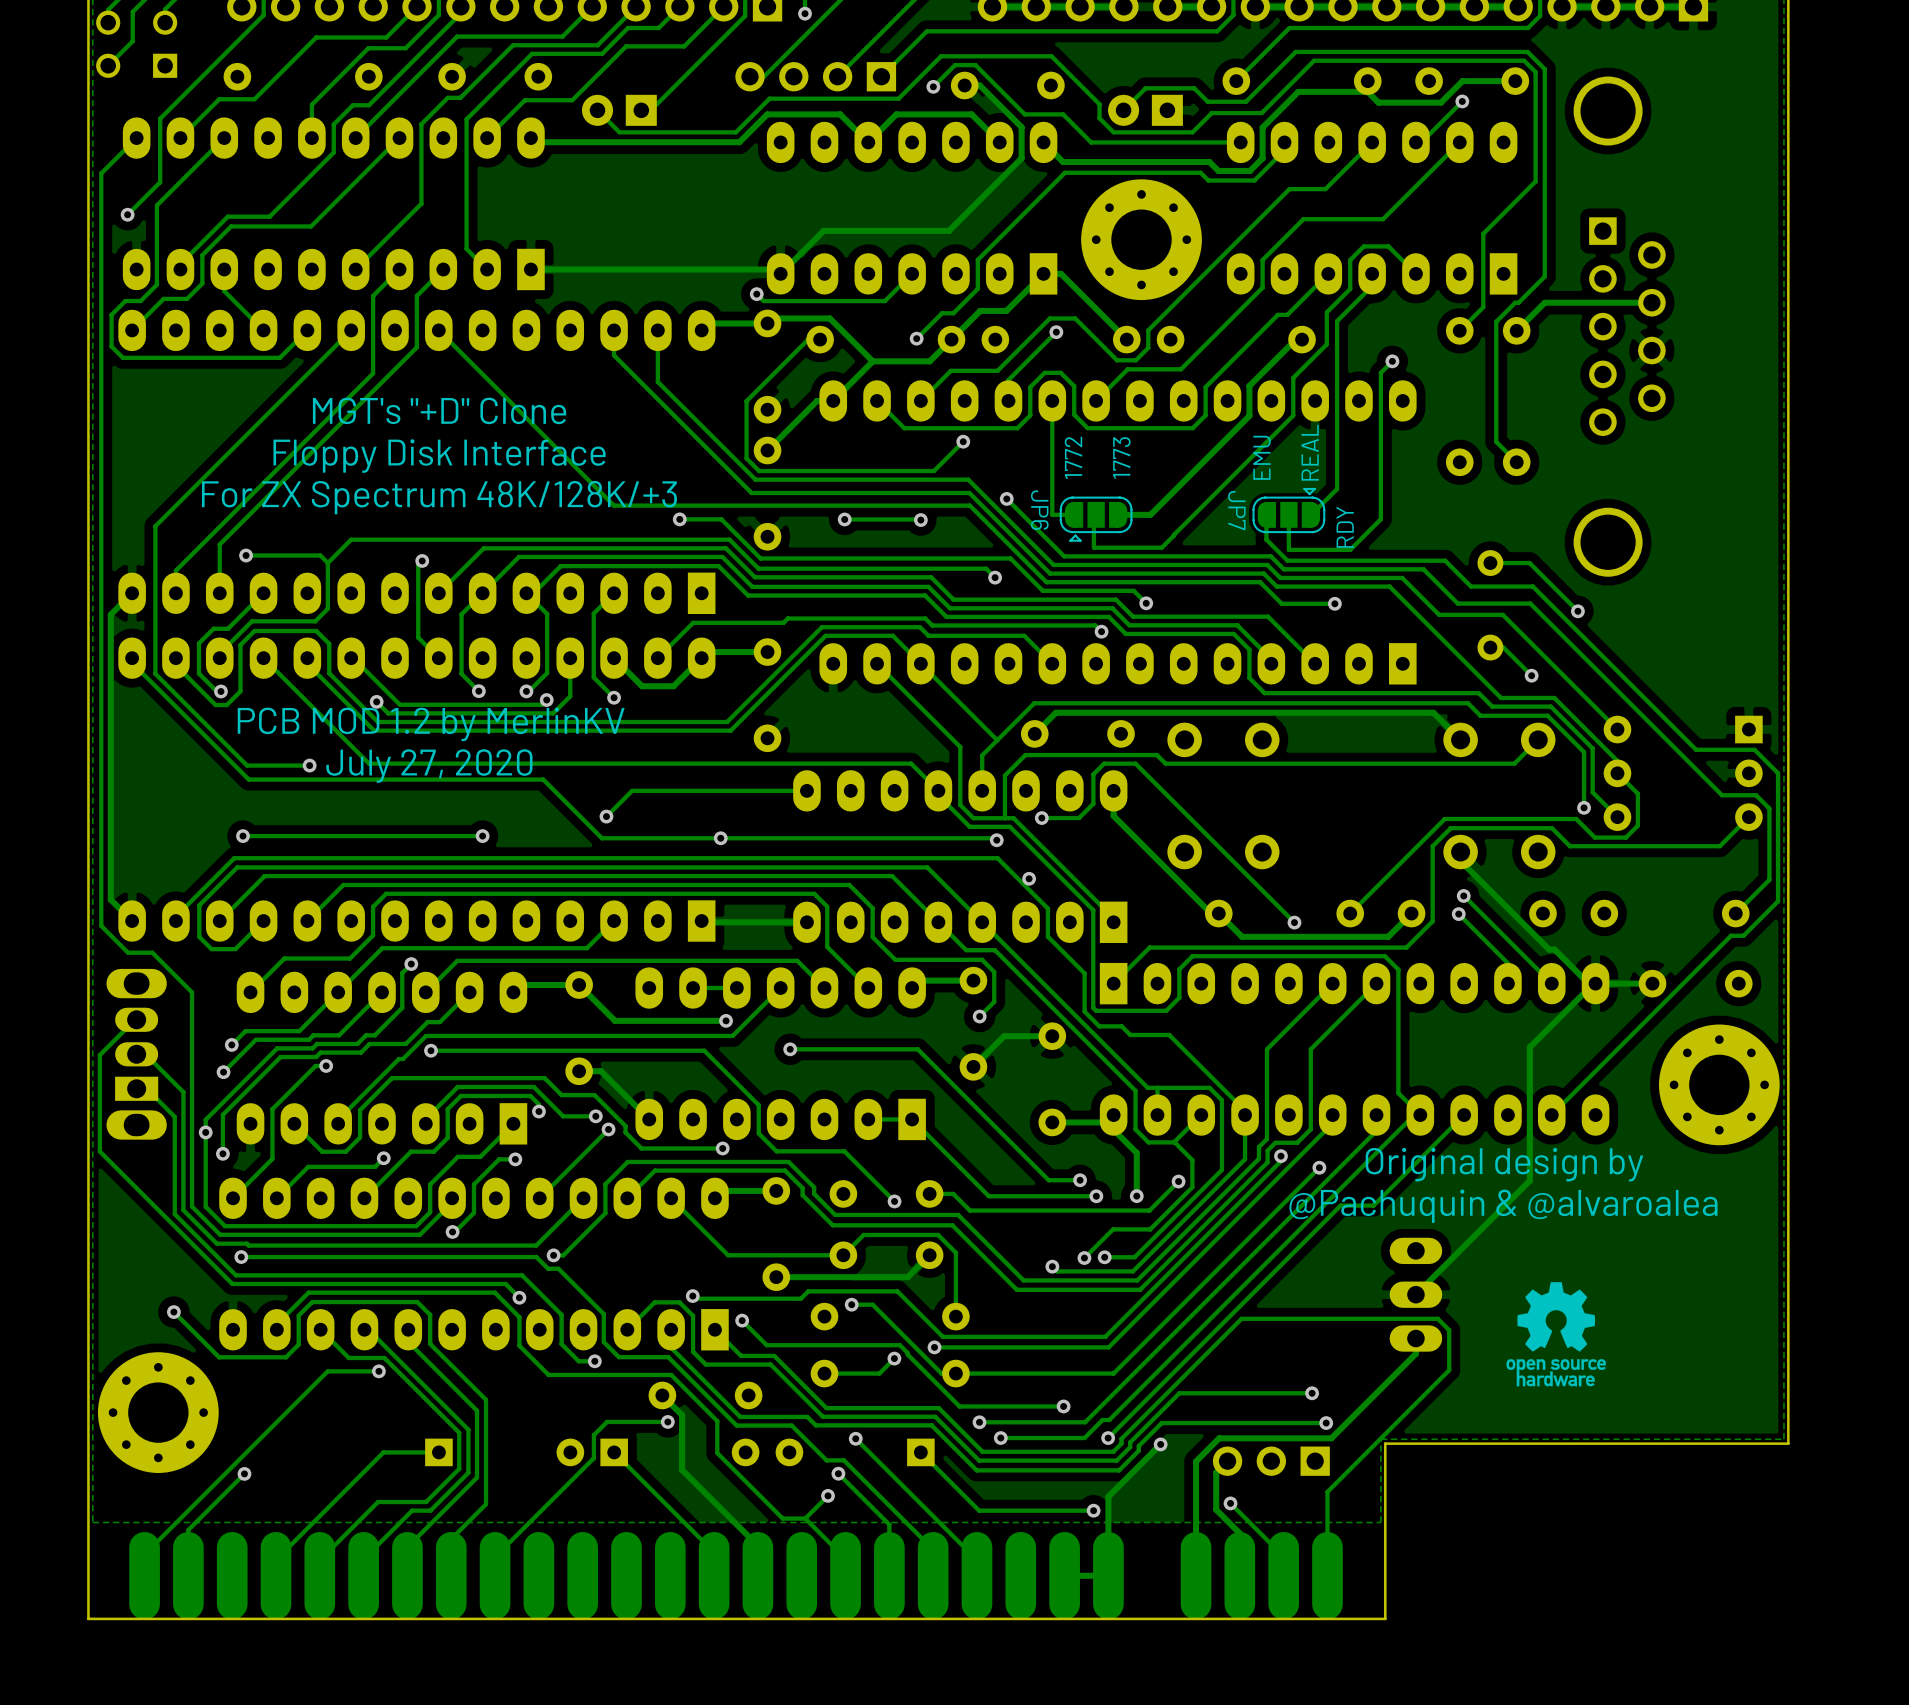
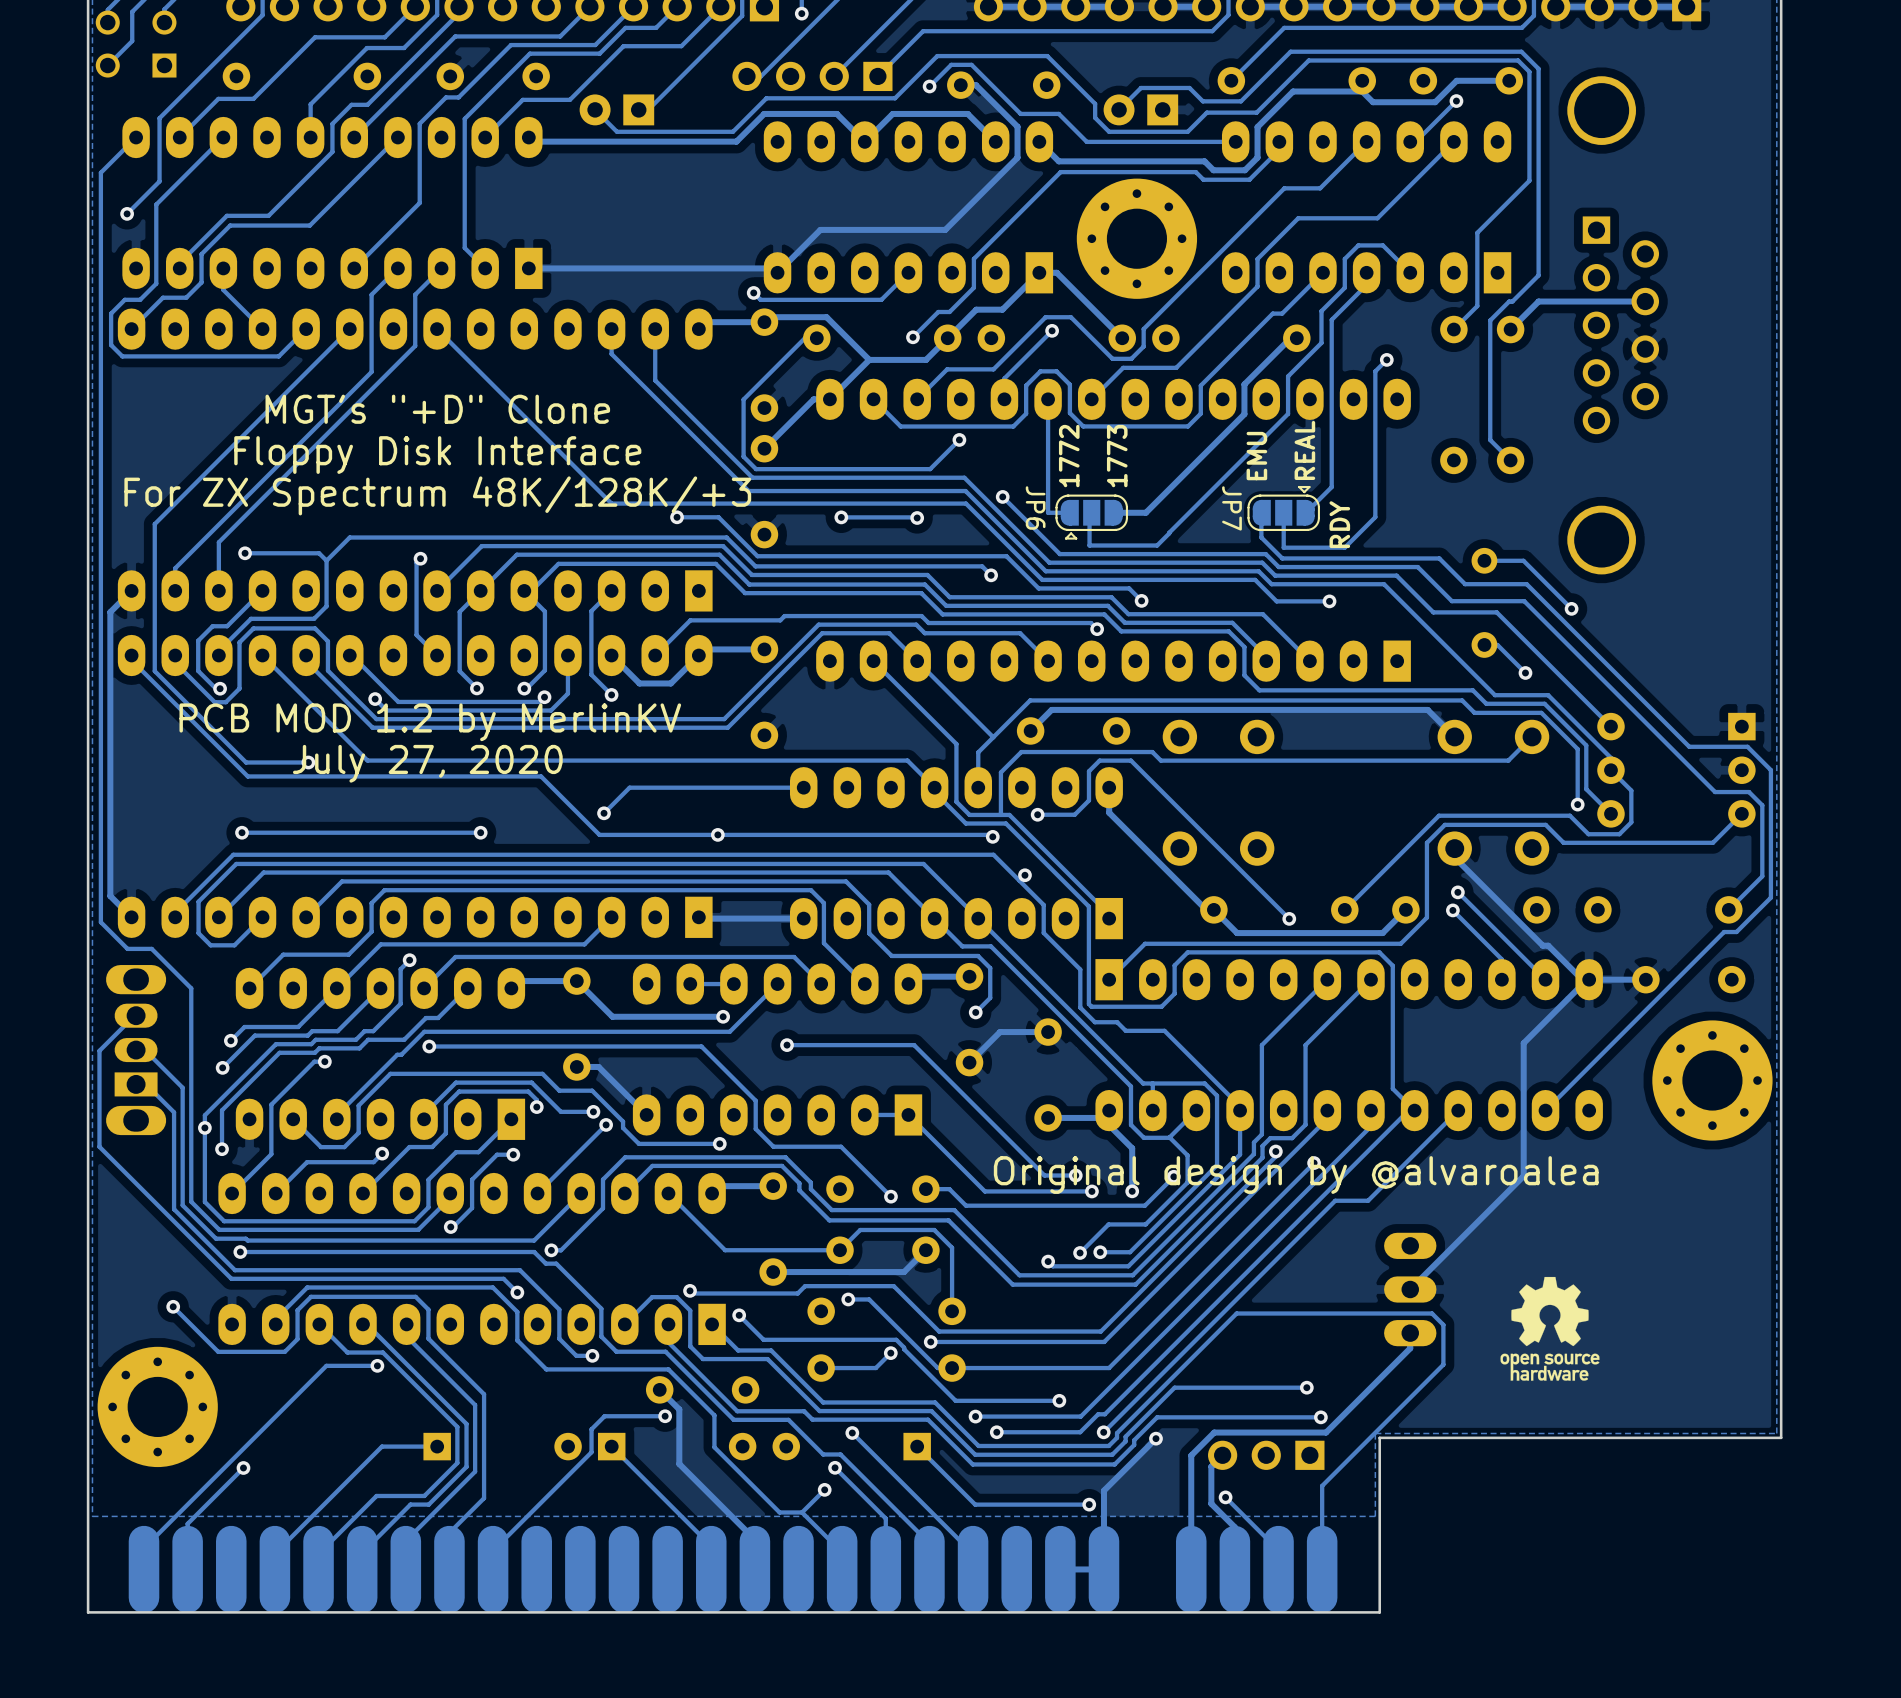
text: Original design by (1504, 1164) -> Original design by @alvaroalea (1296, 1175)
text: @Pachuquin & @alvaroalea (1503, 1206) -> none

